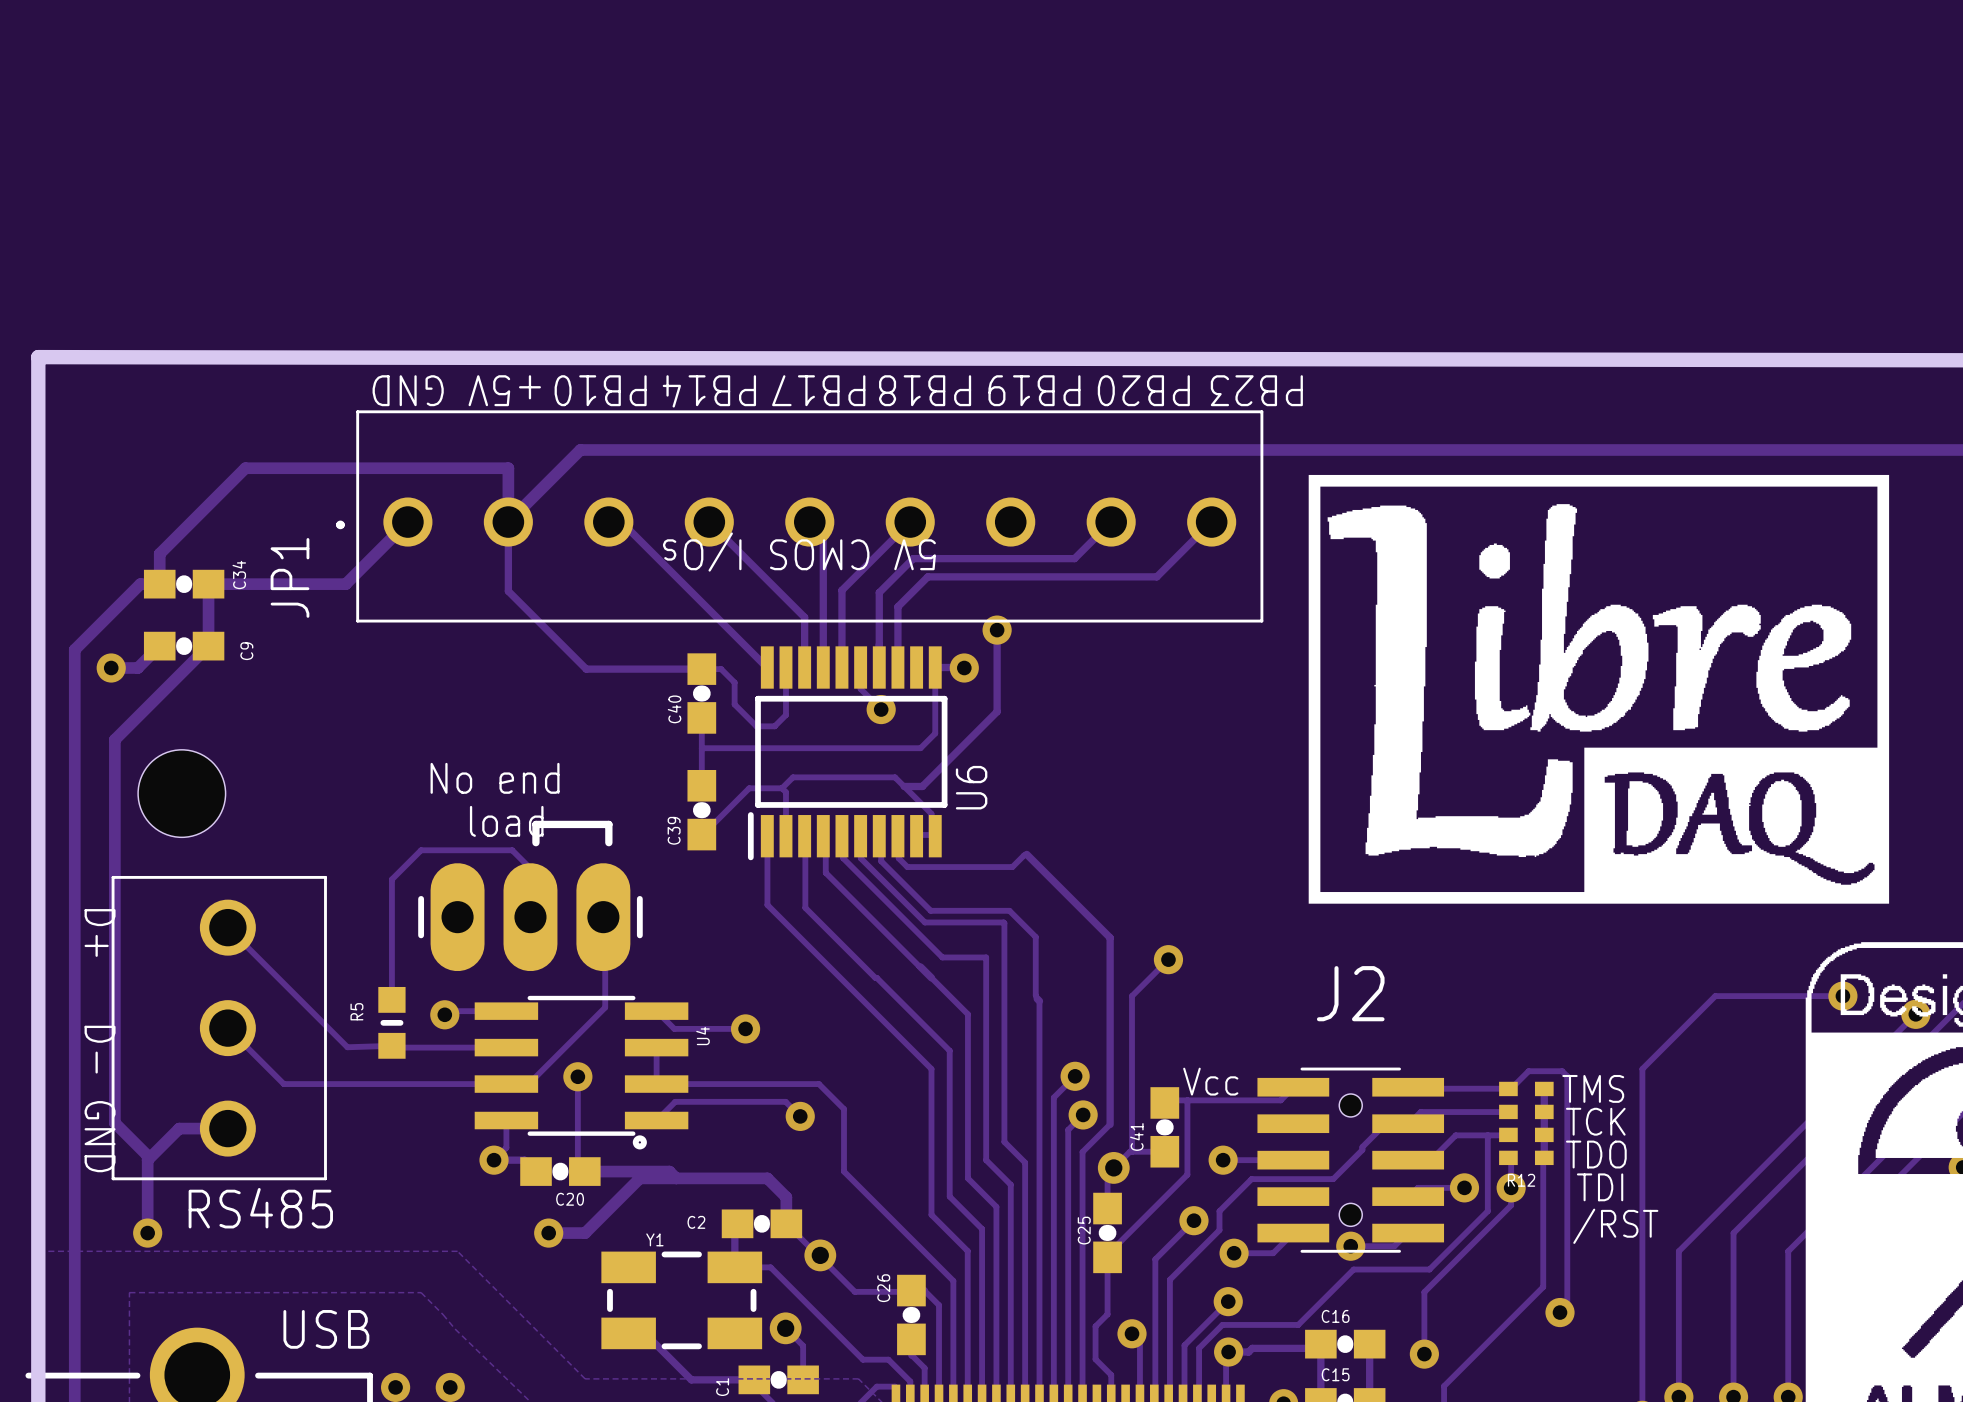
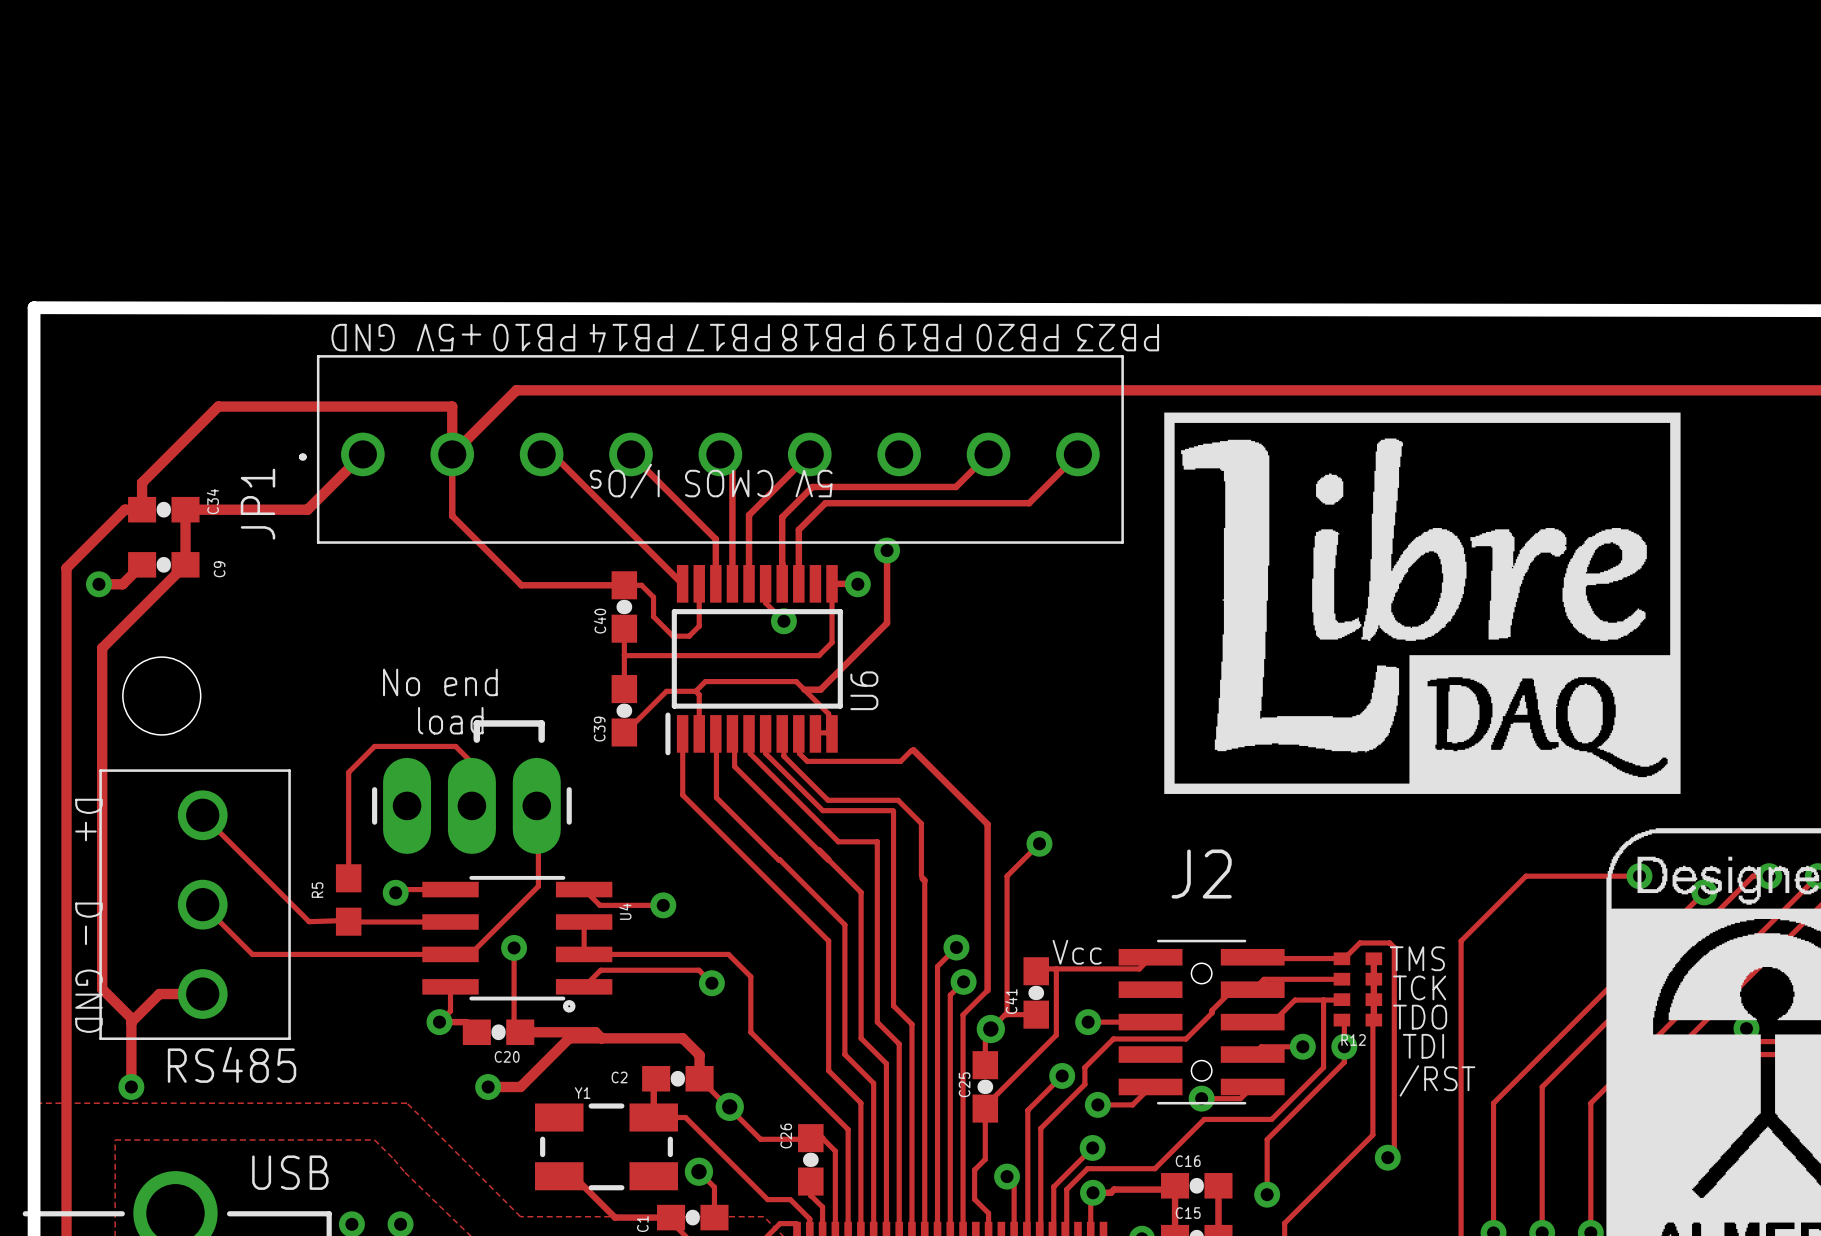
R5 footprint: [378, 986, 406, 1059] -> [335, 864, 362, 936]

